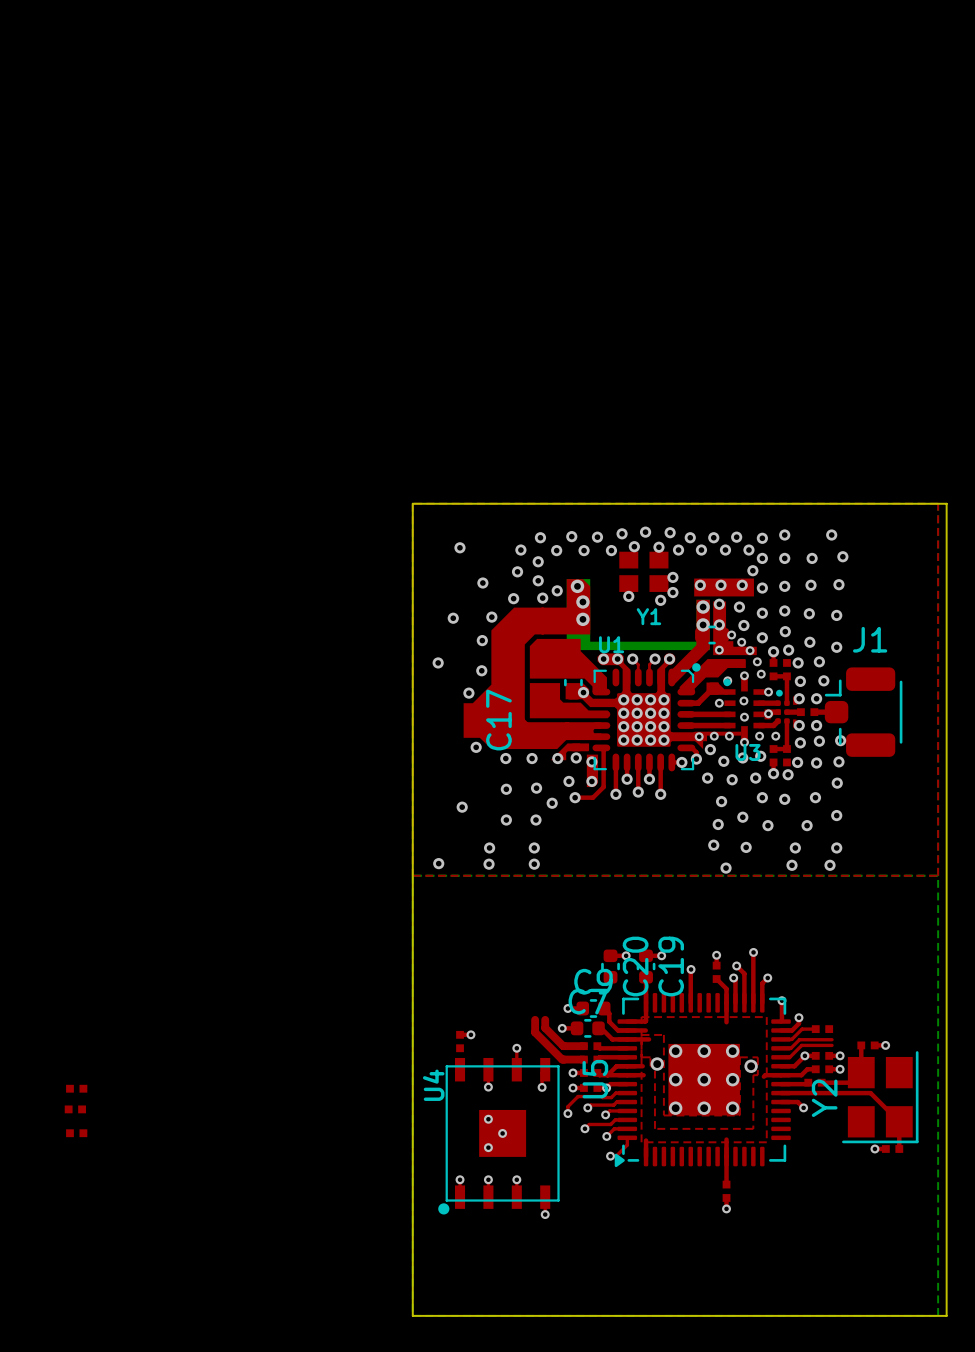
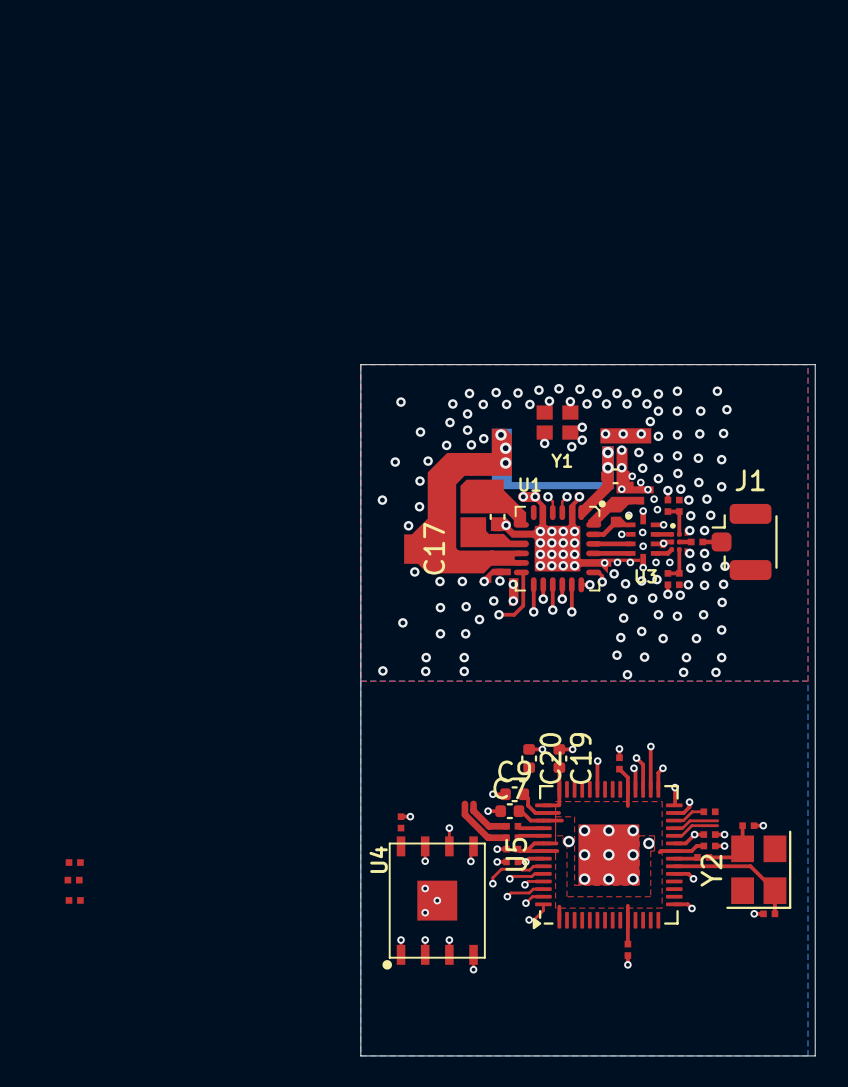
top track: none -> (674, 904) (687, 904) (691, 908)
via: none -> (691, 908)

